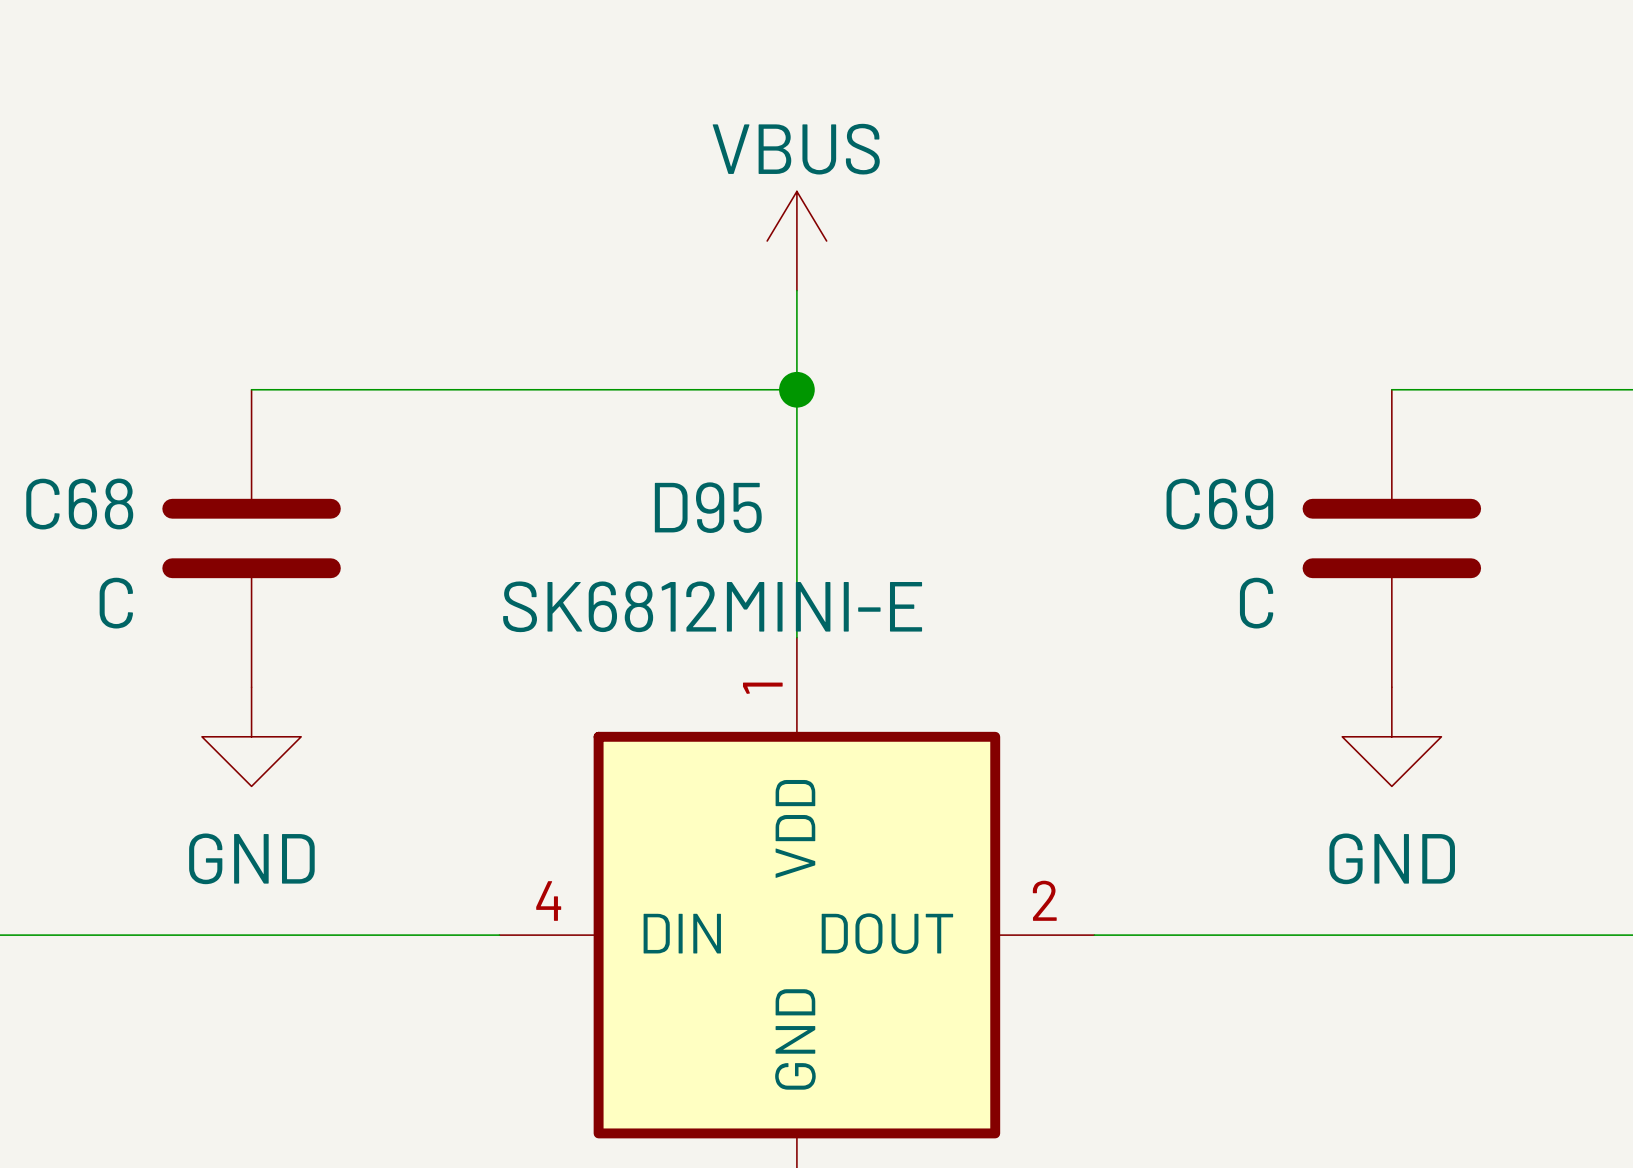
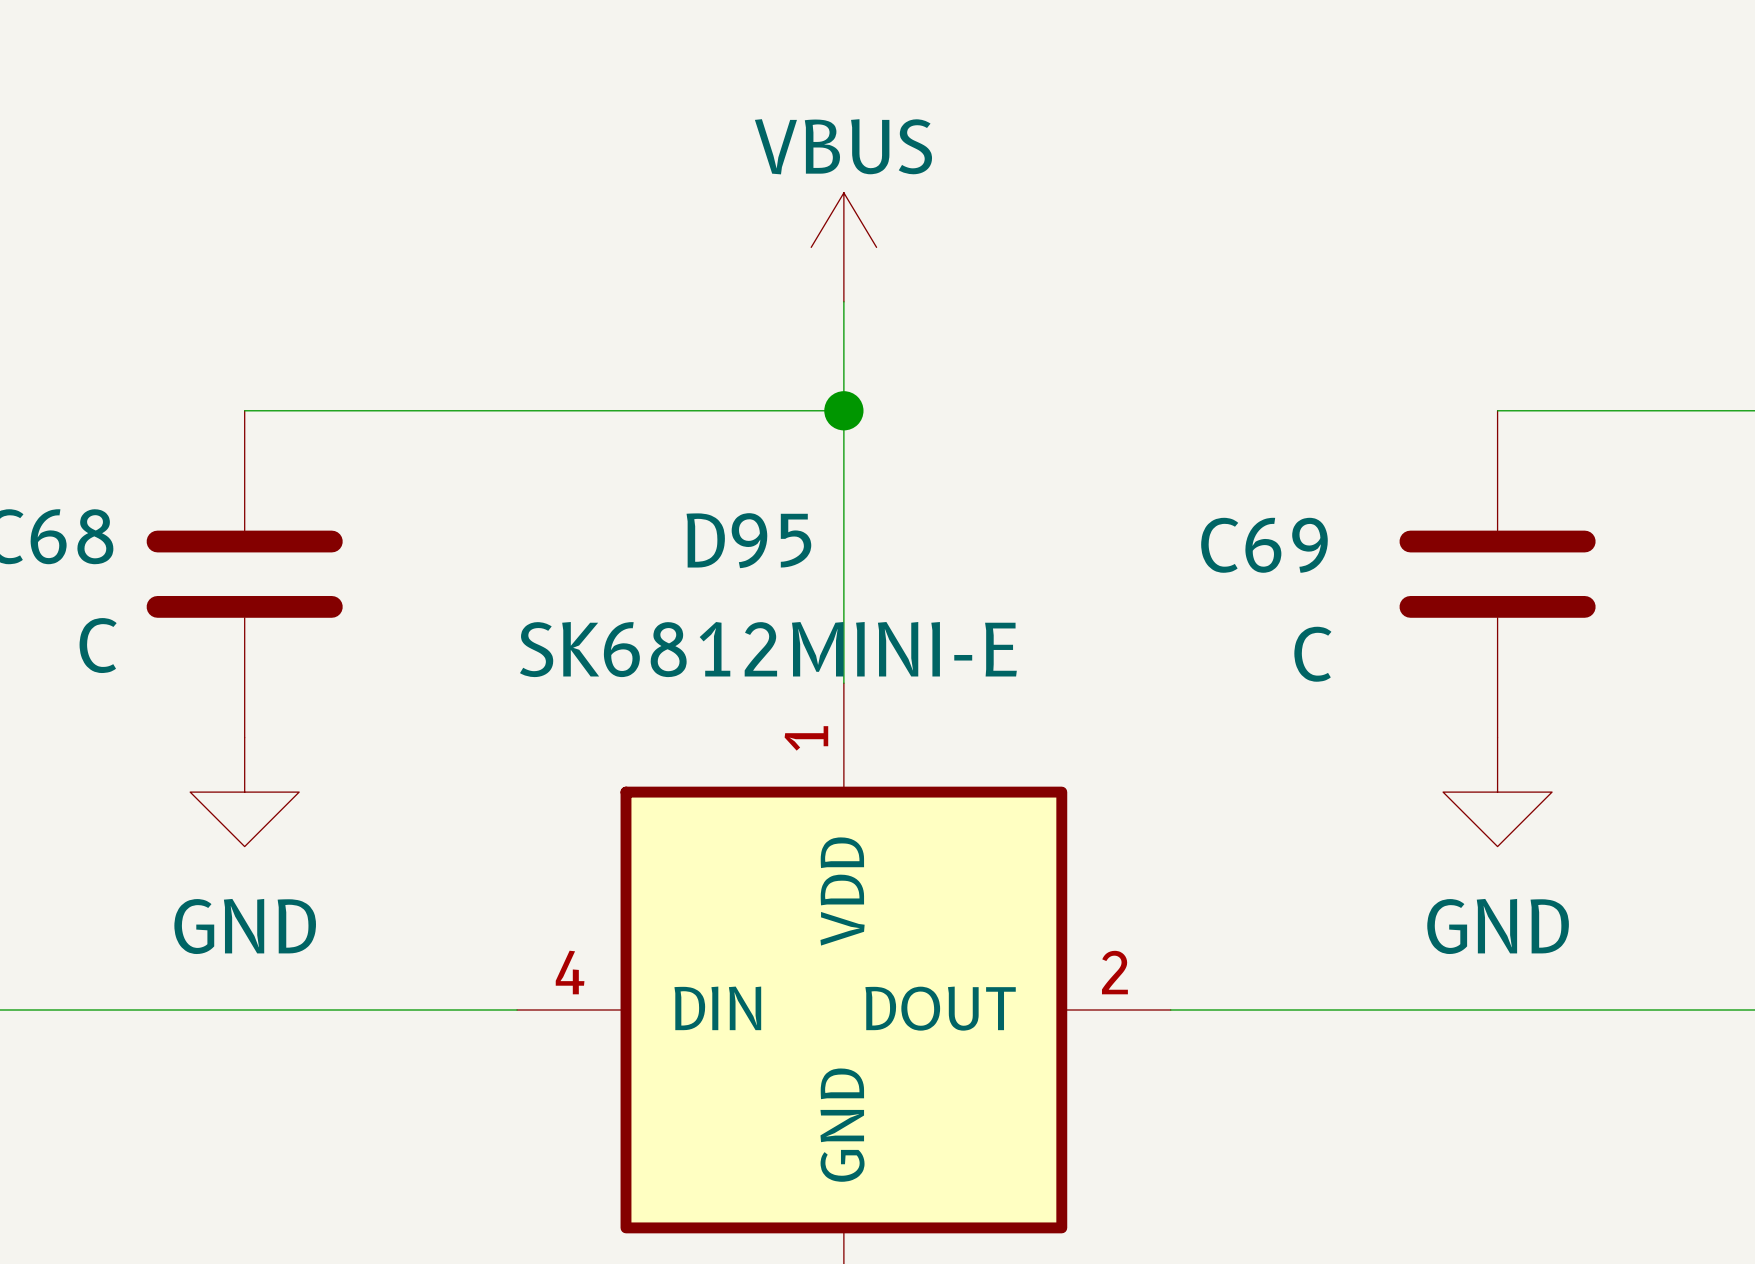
C69 name position: C69 (1219, 504) -> C69 (1264, 545)
C69 value position: C (1256, 603) -> C (1312, 654)

